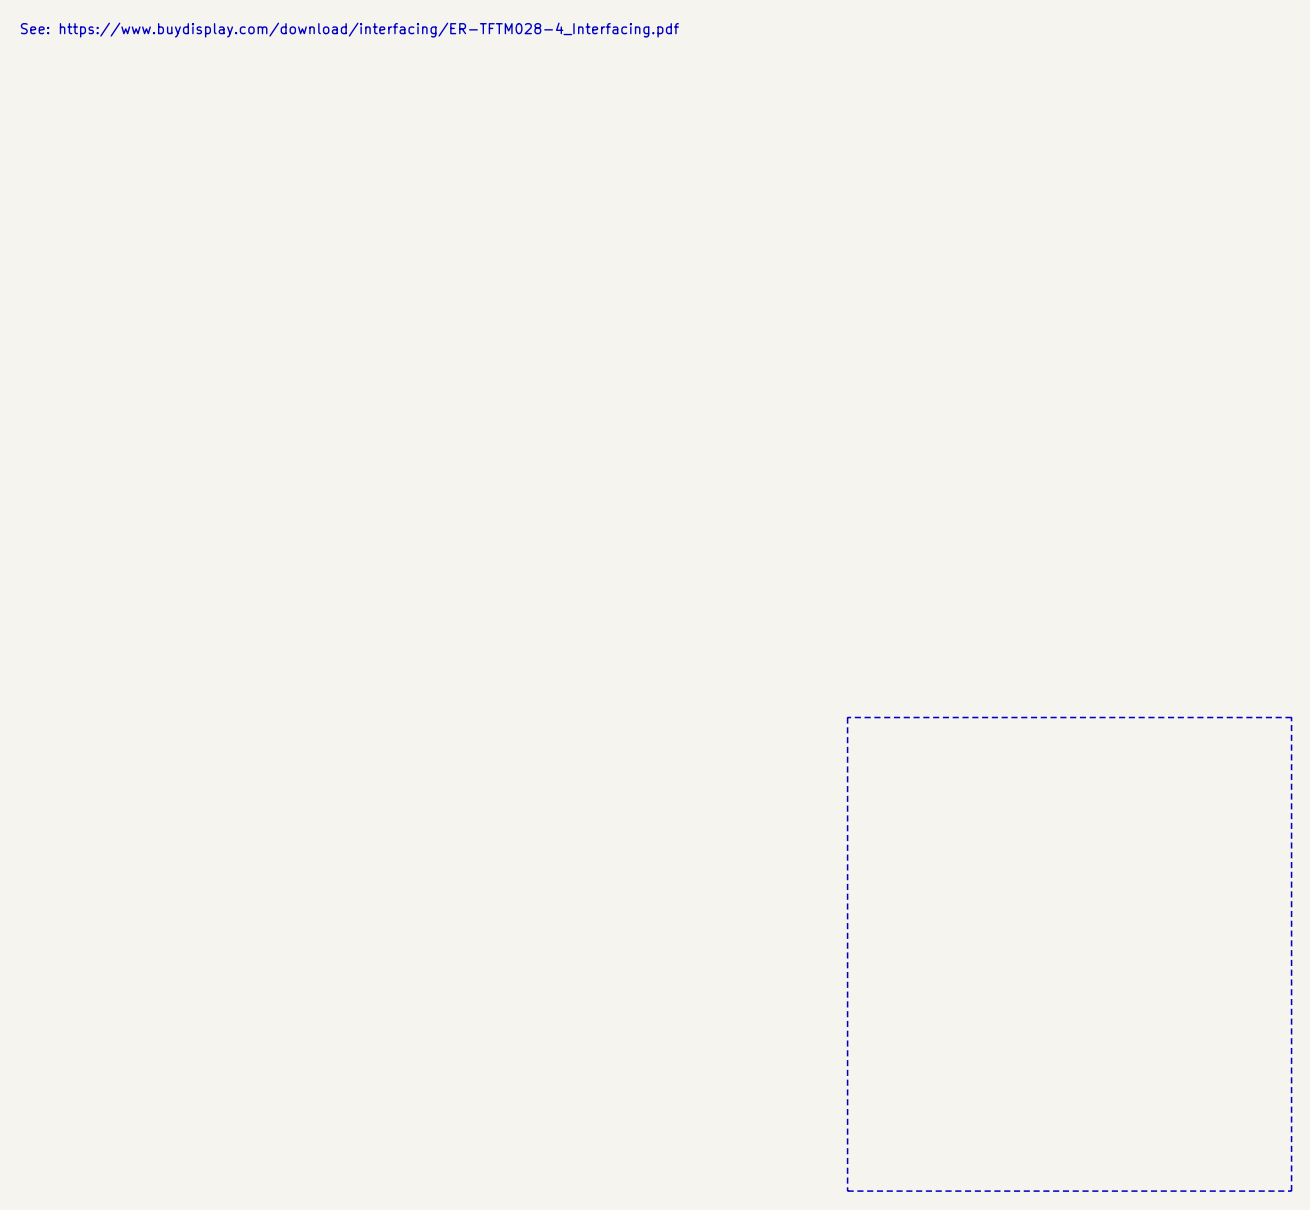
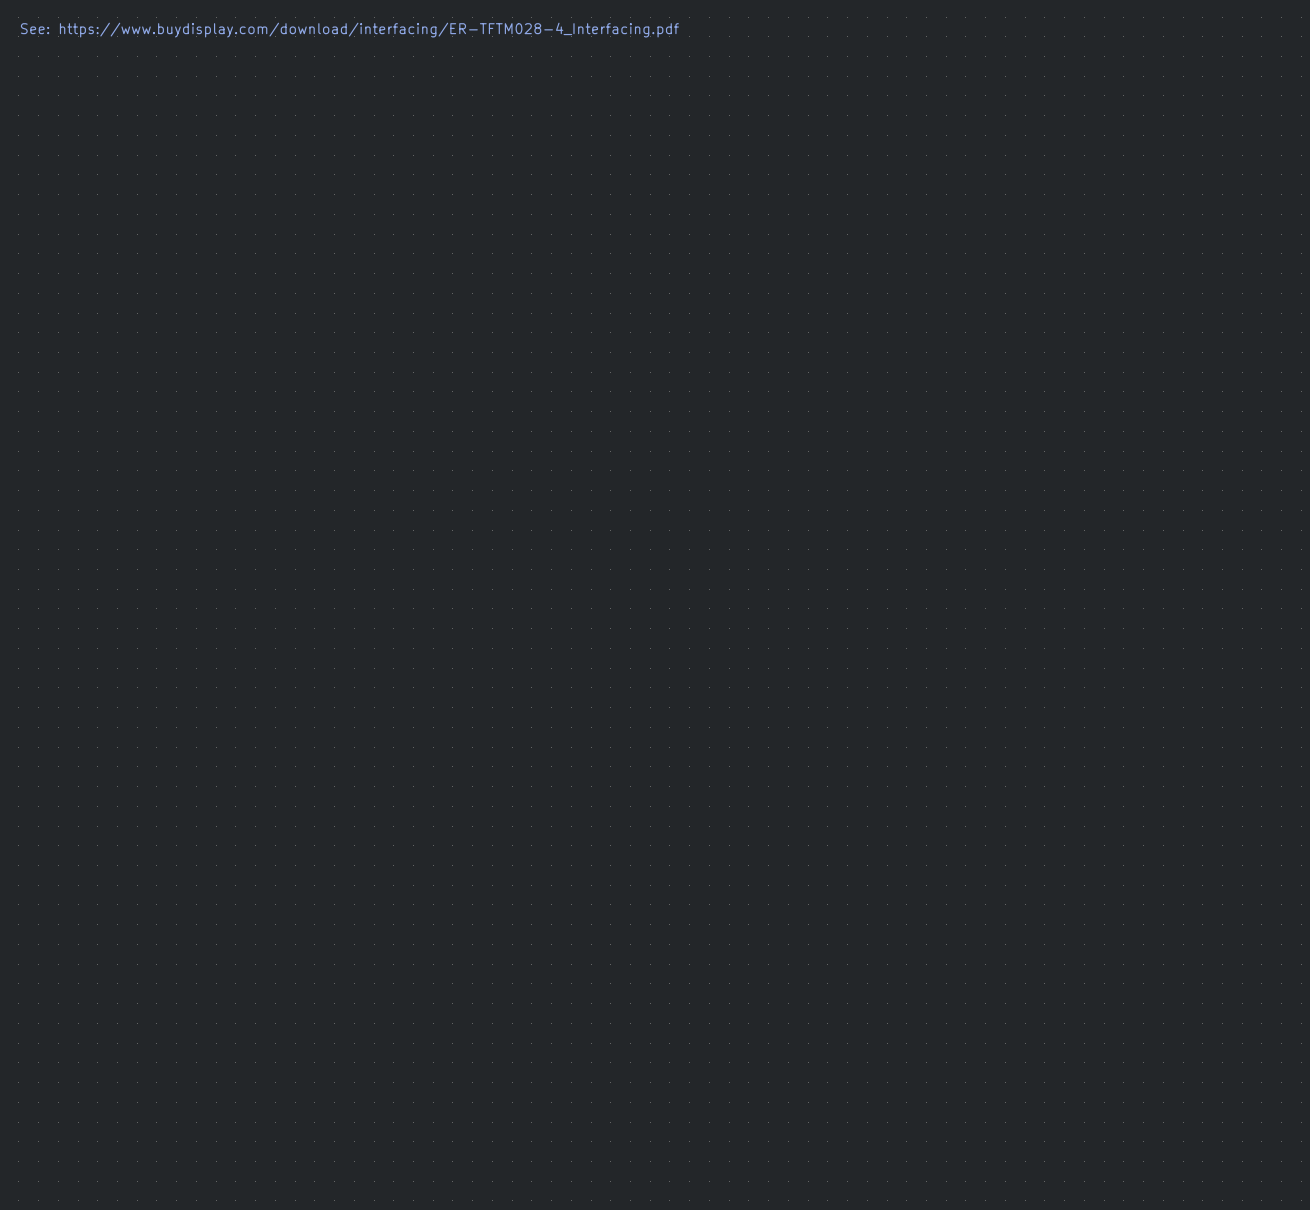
line: (847, 717) (1291, 717) (1291, 1191) (847, 1191) (847, 717) -> none

